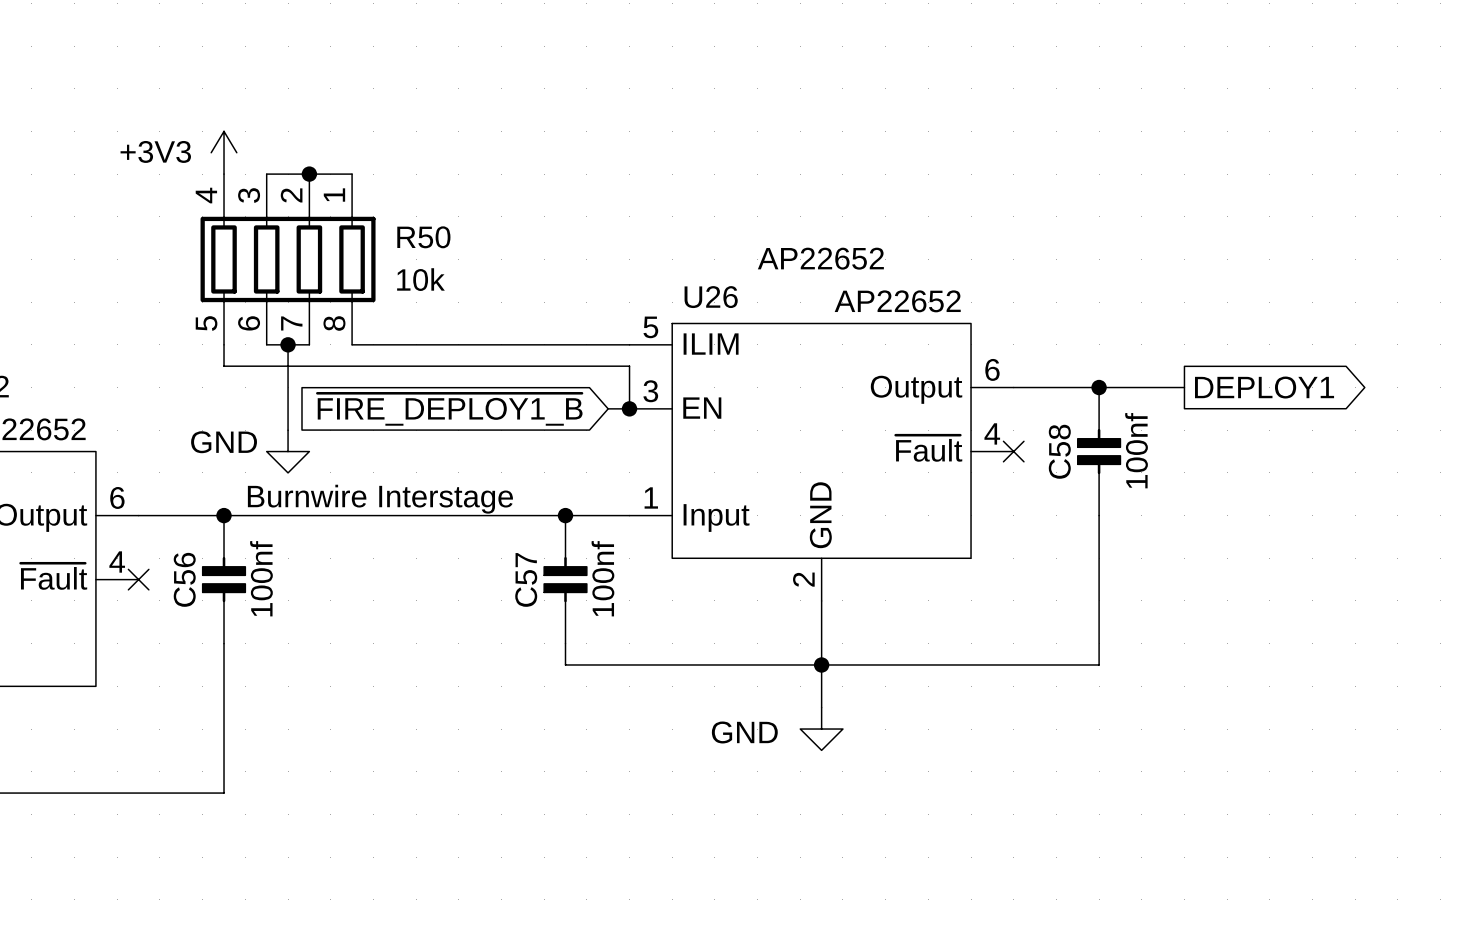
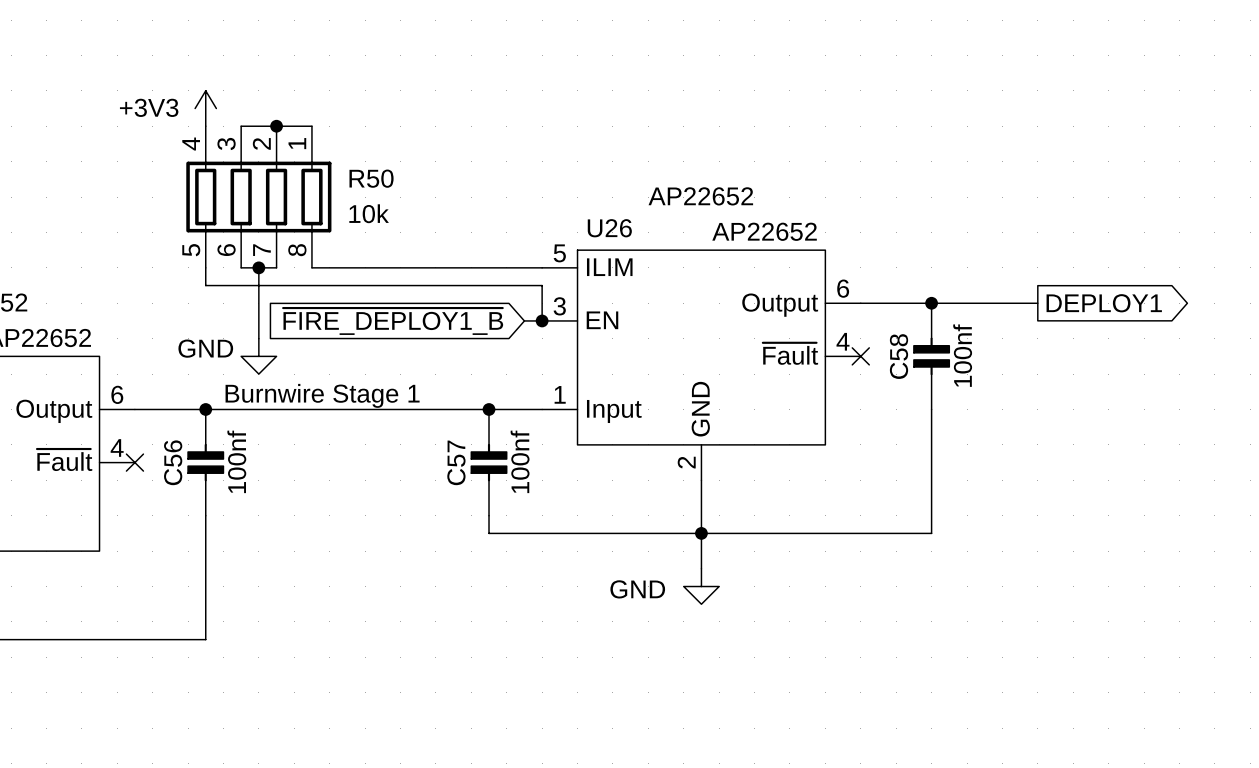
wire: none -> (1002, 303) (1037, 303)
global label position: DEPLOY1 (1264, 387) -> DEPLOY1 (1104, 303)
label: Burnwire Interstage (380, 499) -> Burnwire Stage 1 (322, 395)

